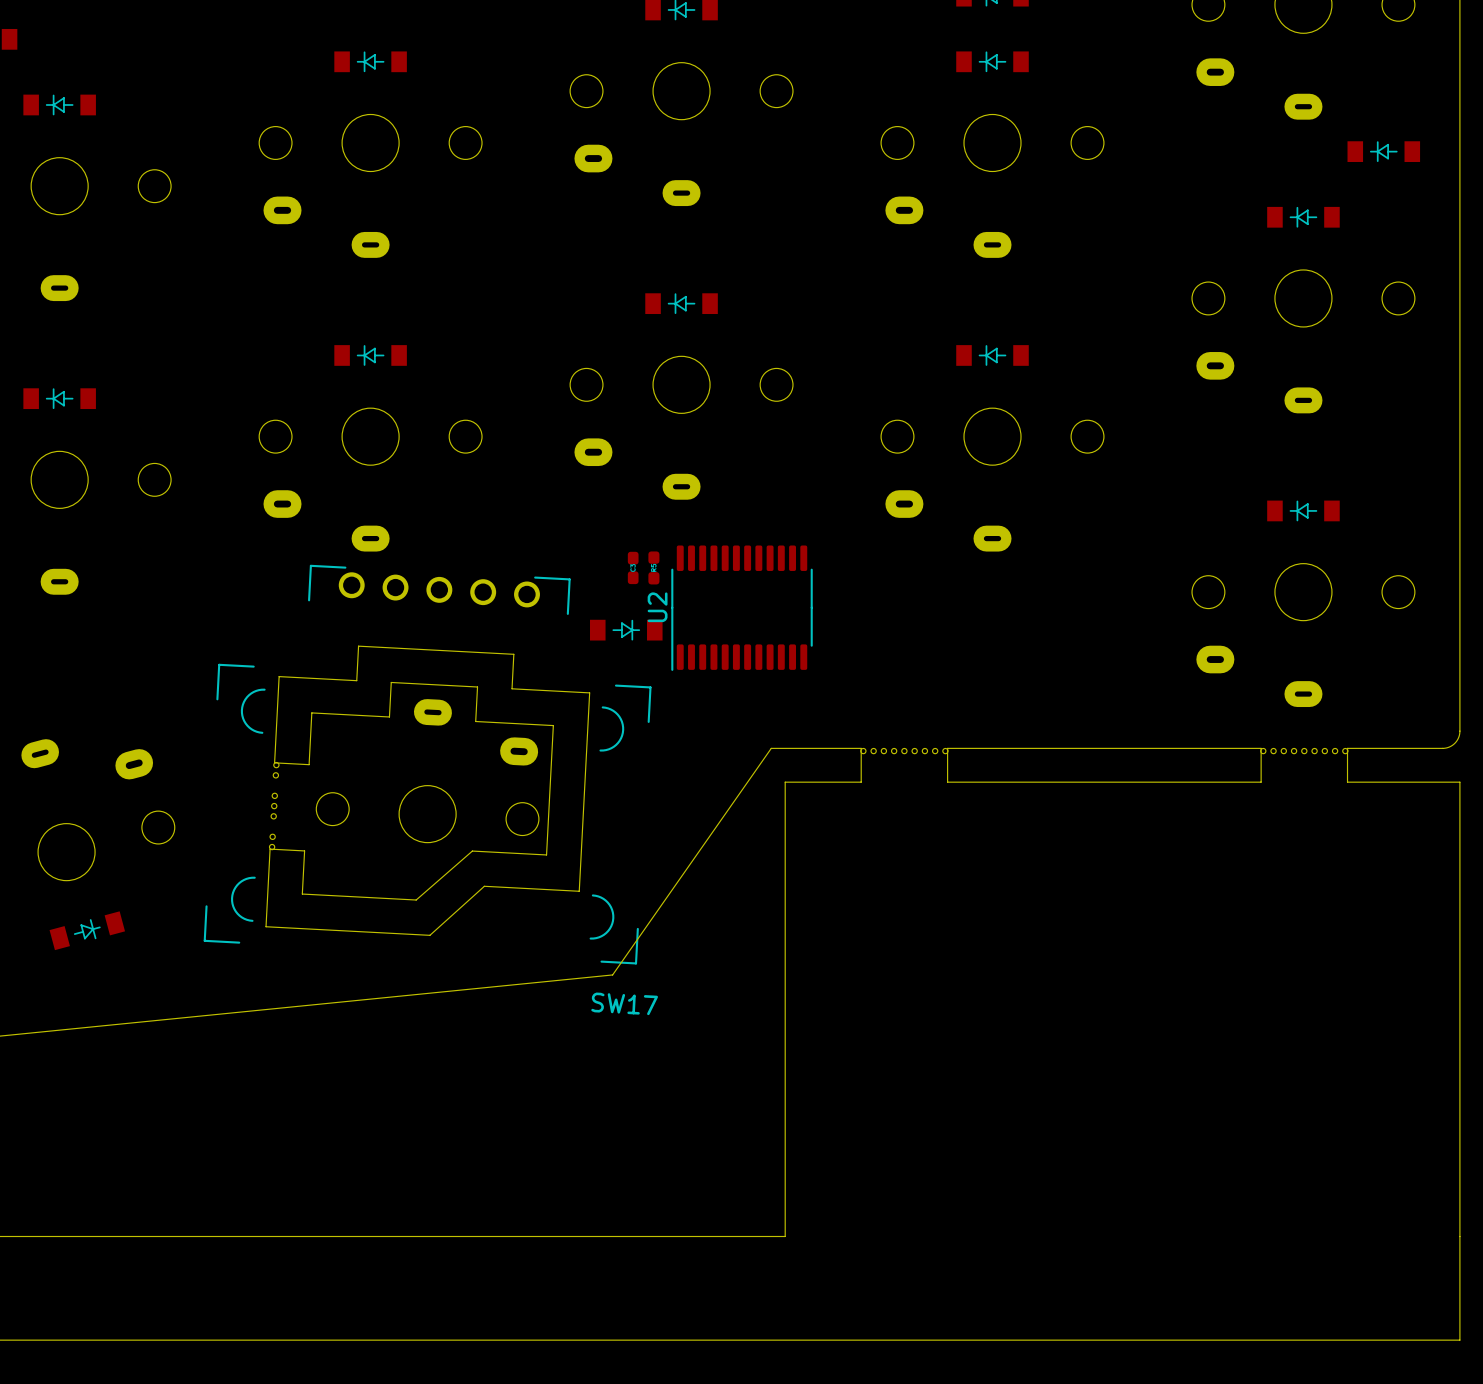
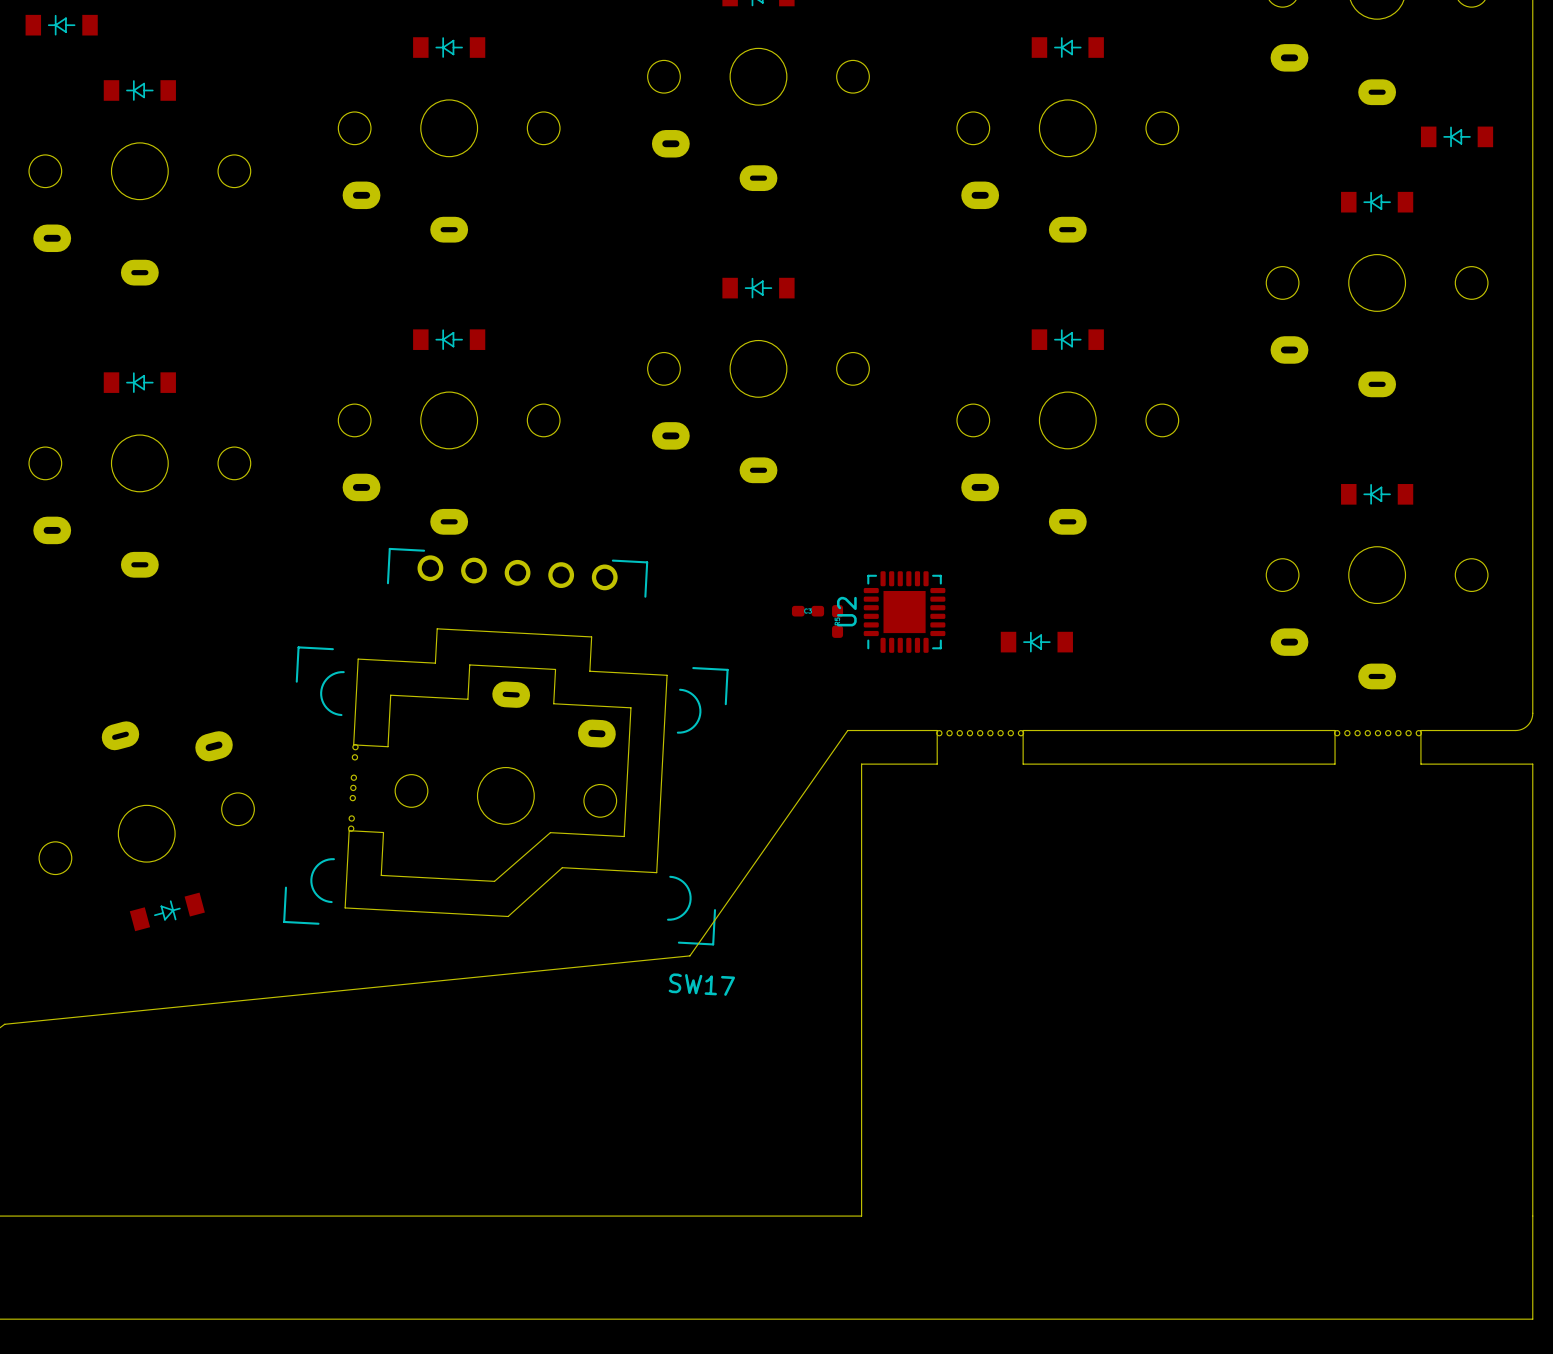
U2 footprint: [671, 545, 813, 671] -> [863, 571, 946, 653]
part rotation: 0° (633, 567) -> 90° clockwise (808, 611)
part position: (633, 567) -> (808, 611)
part position: (653, 567) -> (837, 621)
part rotation: 0° (626, 630) -> 180° (1036, 642)
part position: (626, 630) -> (1036, 642)

